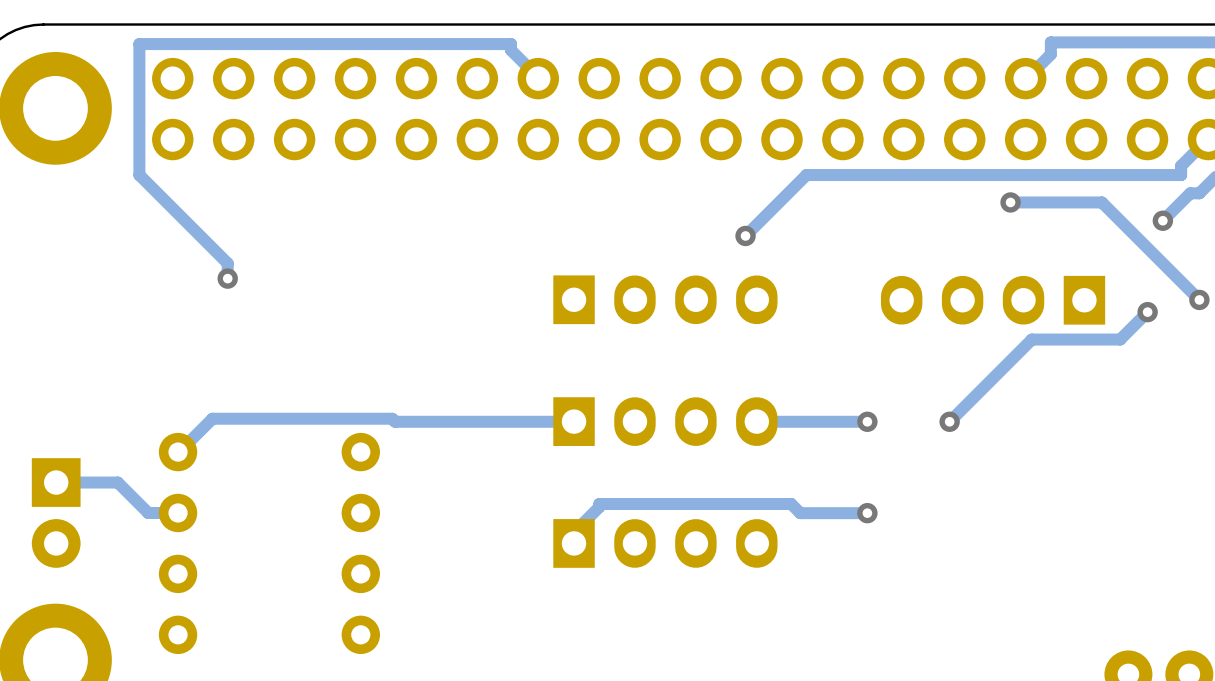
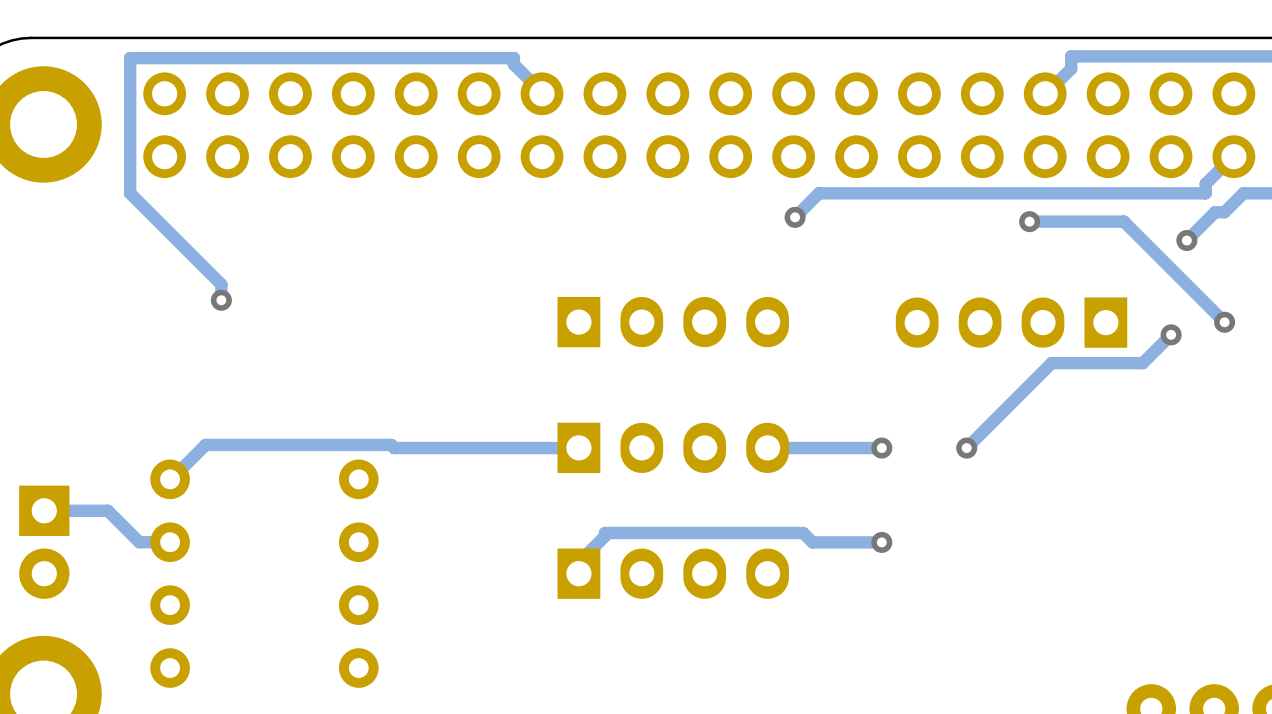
track: (806, 175) (745, 235) -> (818, 193) (795, 217)
via position: (745, 235) -> (795, 217)

